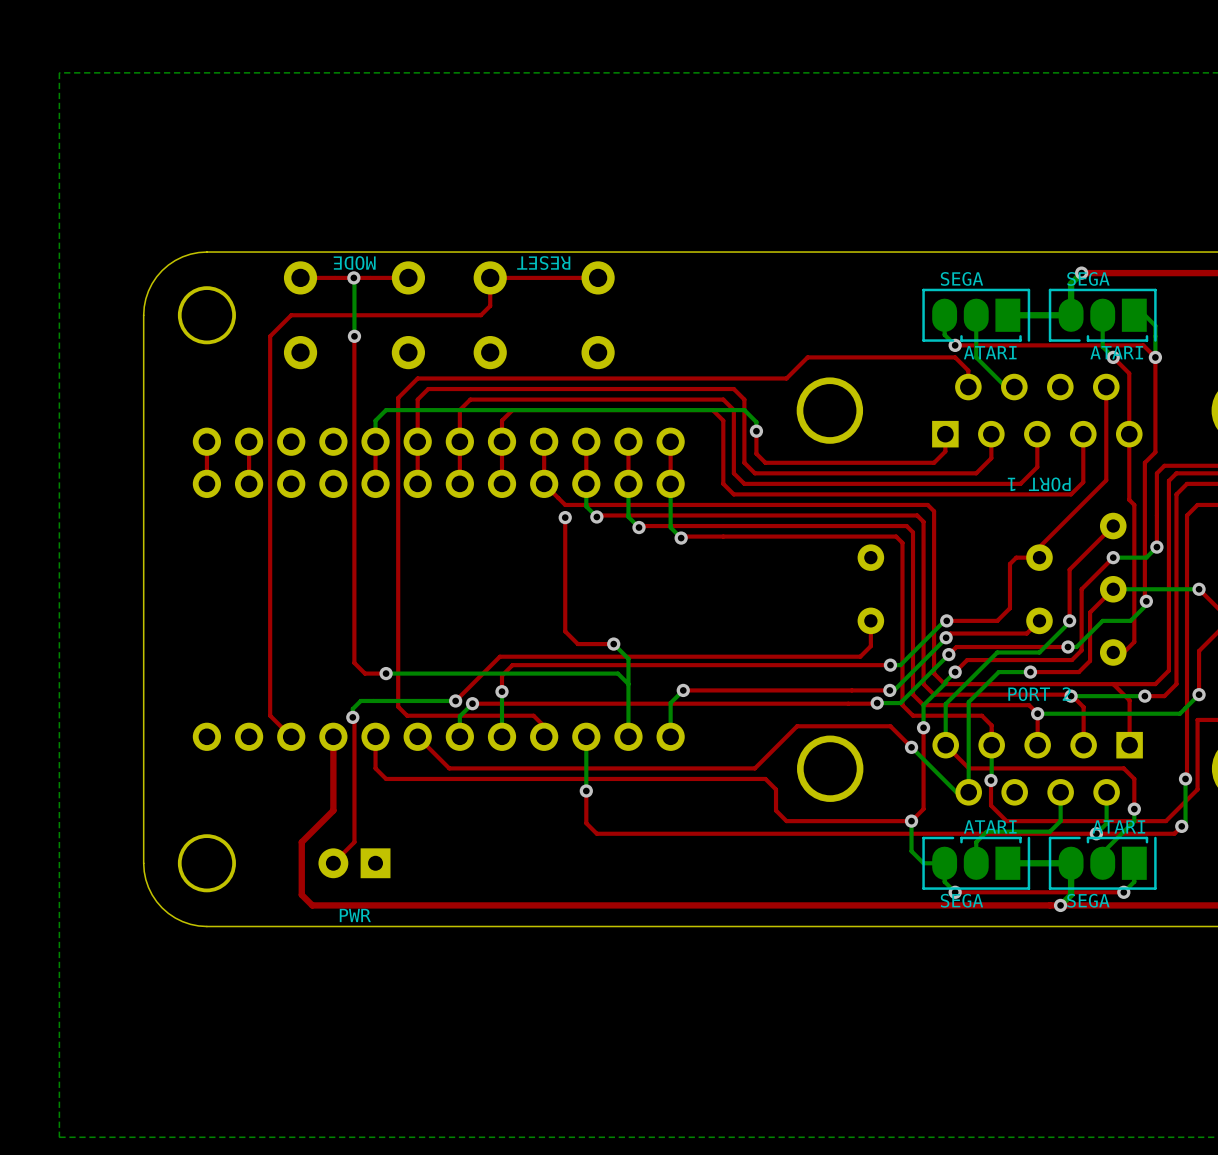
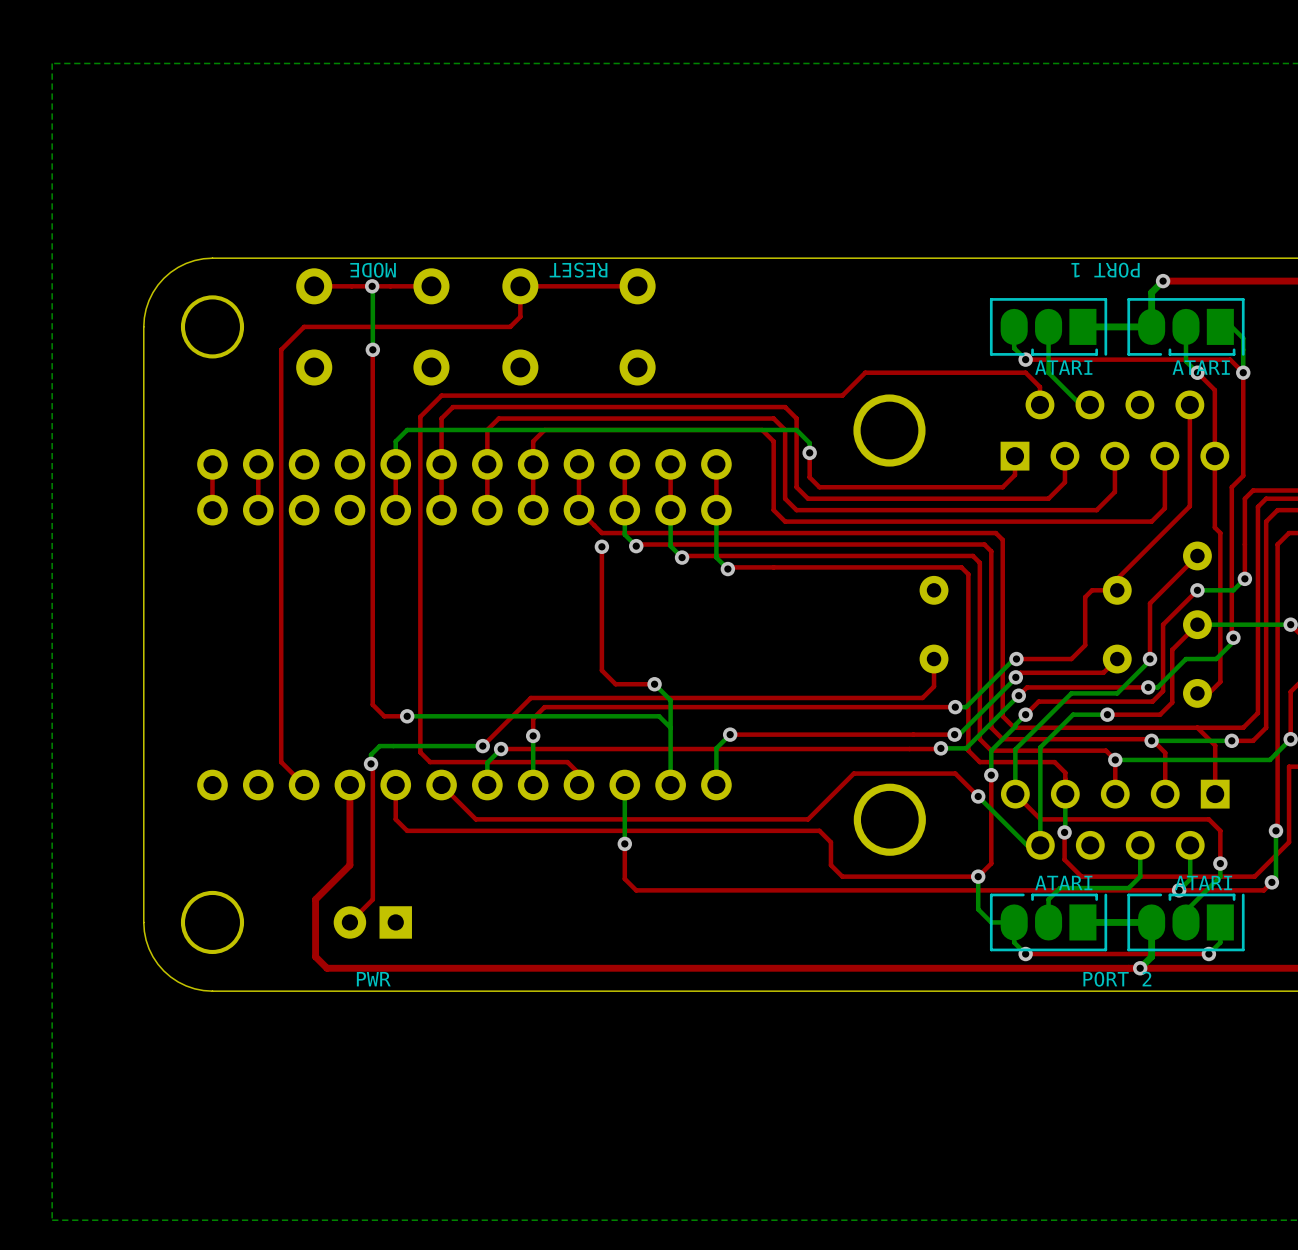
text: SEGA (961, 278) -> none
text: SEGA (1088, 278) -> none
text position: PORT 1 (1039, 484) -> PORT 1 (1105, 270)
text position: PORT 2 (1039, 694) -> PORT 2 (1117, 979)
text: SEGA (961, 900) -> none
text: SEGA (1088, 900) -> none

